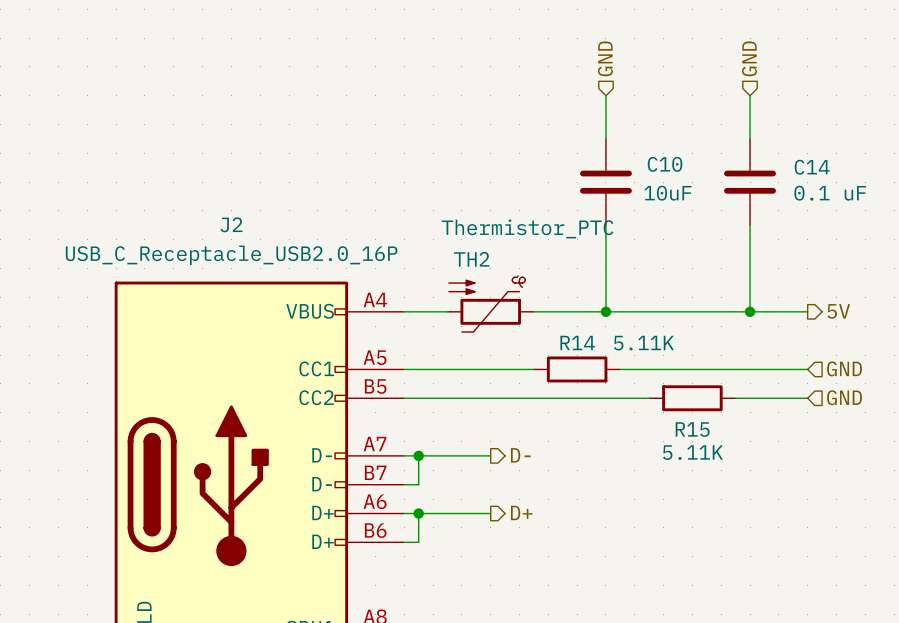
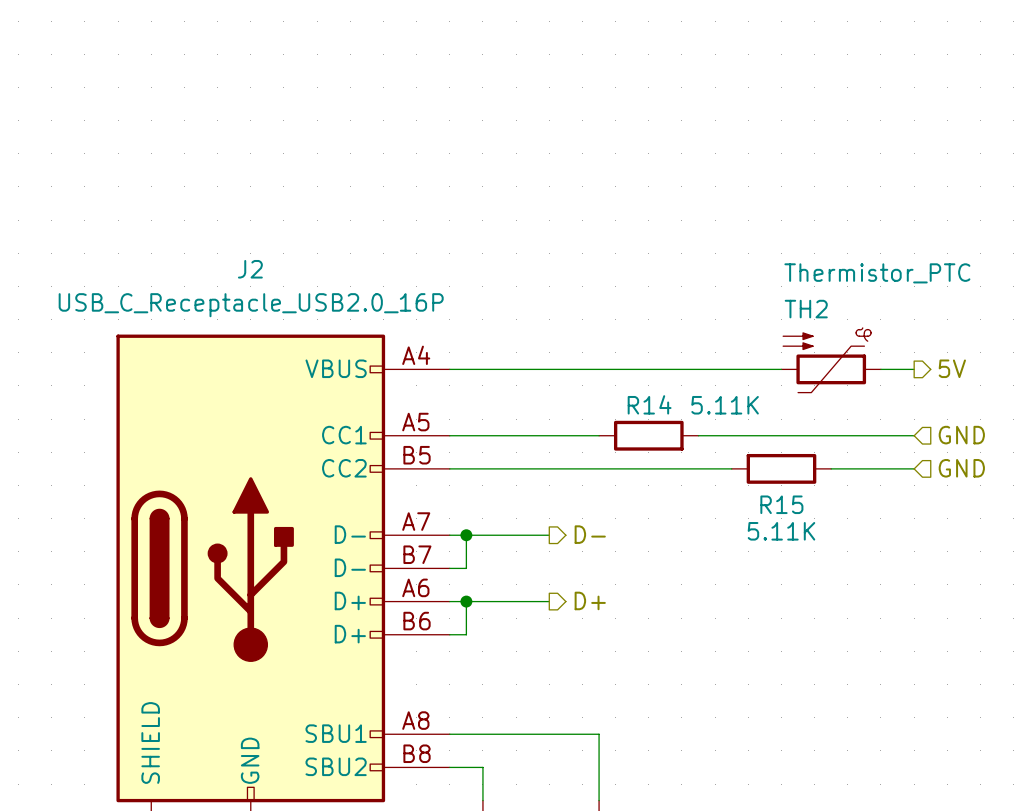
hierarchical label: GND (605, 58) -> none
hierarchical label: GND (749, 58) -> none
wire: (605, 95) (605, 138) -> none
wire: (750, 95) (750, 138) -> none
C10: 10uF (605, 182) -> none
C14: 0.1 uF (750, 182) -> none
wire: (605, 225) (605, 311) -> none
wire: (750, 225) (750, 311) -> none
TH2 position: (490, 303) -> (831, 360)
junction: (605, 311) -> none
wire: (692, 311) (778, 311) -> (499, 369) (599, 369)
junction: (750, 311) -> none

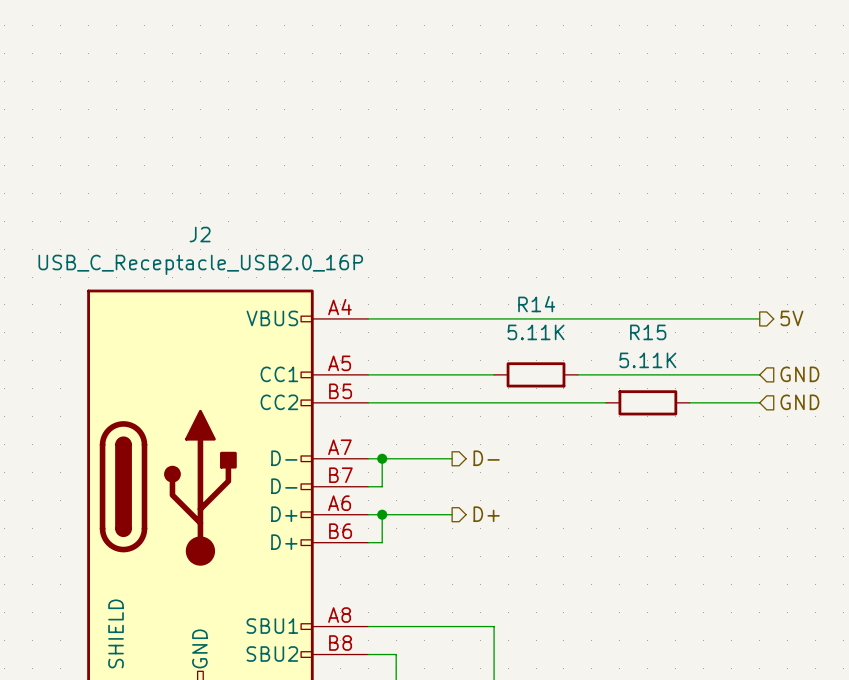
TH2: Thermistor_PTC (831, 360) -> none
wire: none -> (647, 318) (731, 318)
R14 name position: R14 (649, 404) -> R14 (536, 304)
R14 value position: 5.11K (725, 405) -> 5.11K (536, 332)
R15 name position: R15 (781, 504) -> R15 (648, 332)
R15 value position: 5.11K (781, 531) -> 5.11K (647, 360)

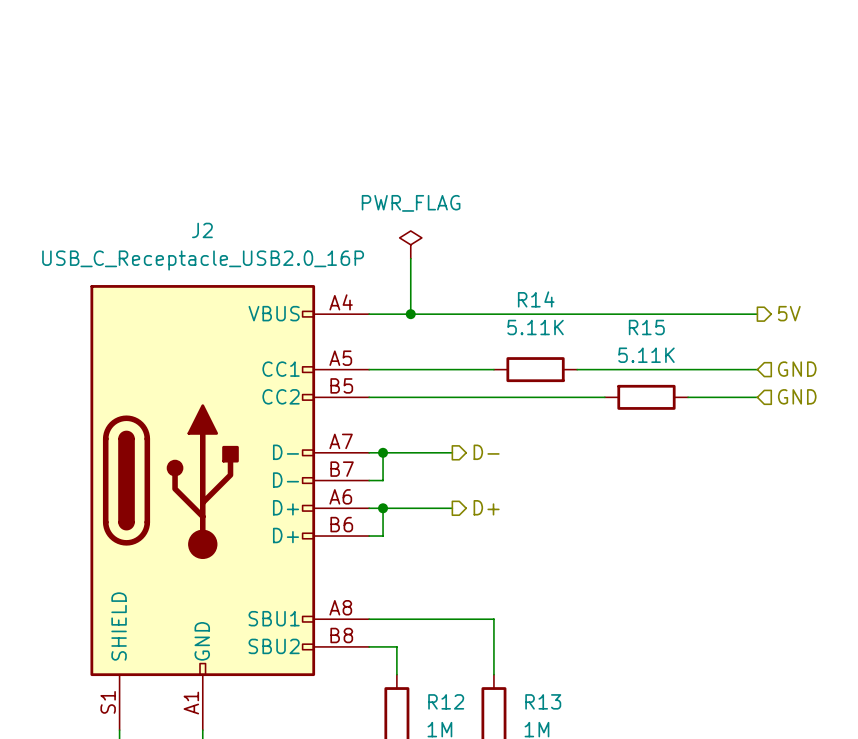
power symbol: none -> PWR_FLAG (410, 244)
wire: none -> (410, 258) (410, 314)
junction: none -> (410, 314)

